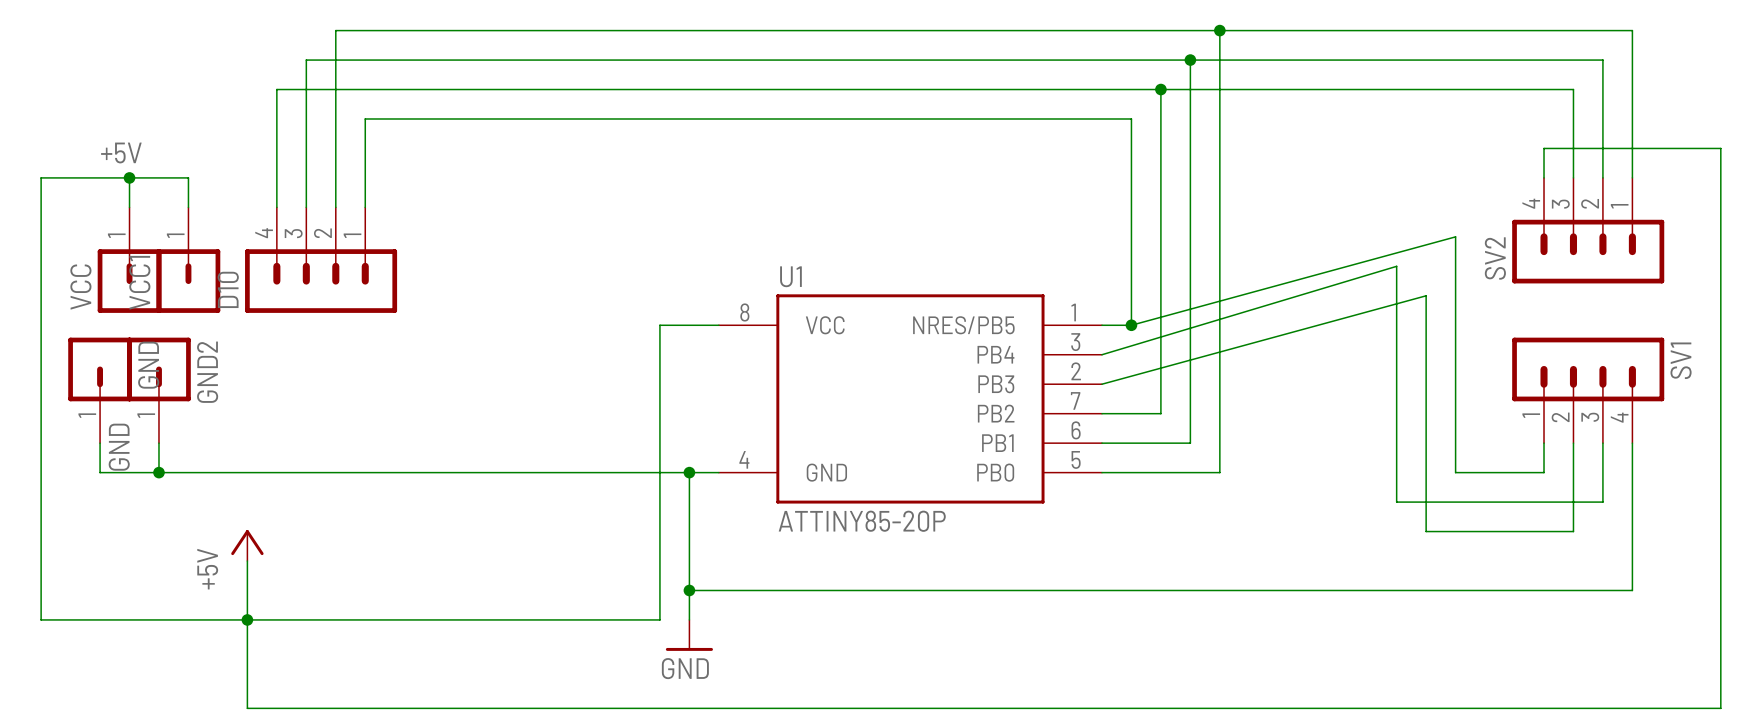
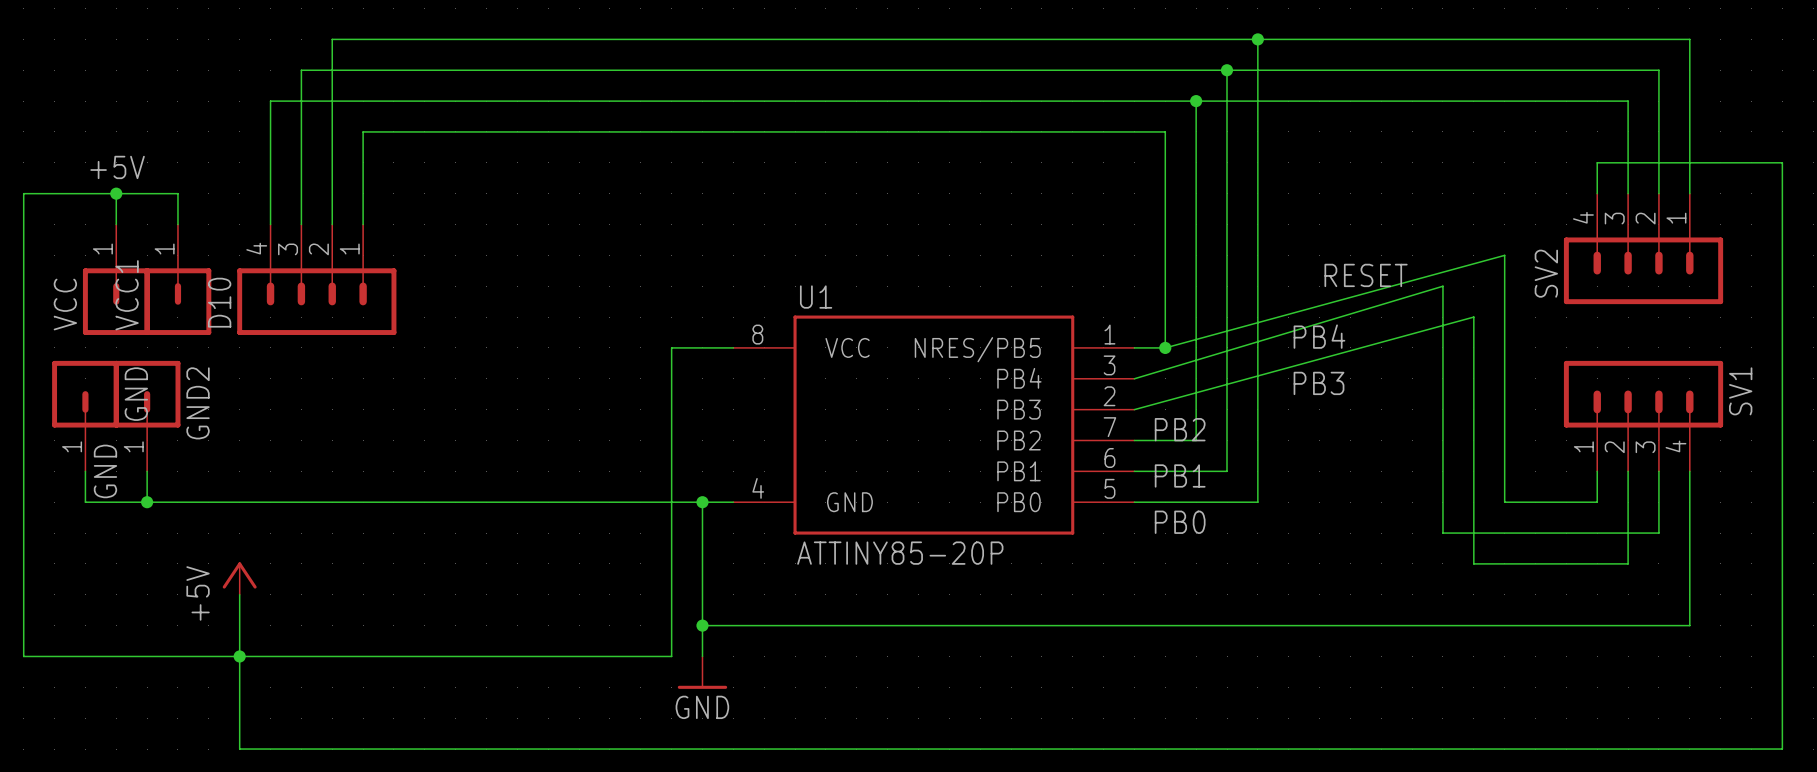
label: none -> RESET (1366, 275)
label: none -> PB4 (1319, 336)
label: none -> PB3 (1319, 383)
label: none -> PB2 (1180, 429)
label: none -> PB1 (1180, 475)
label: none -> PB0 (1180, 522)

